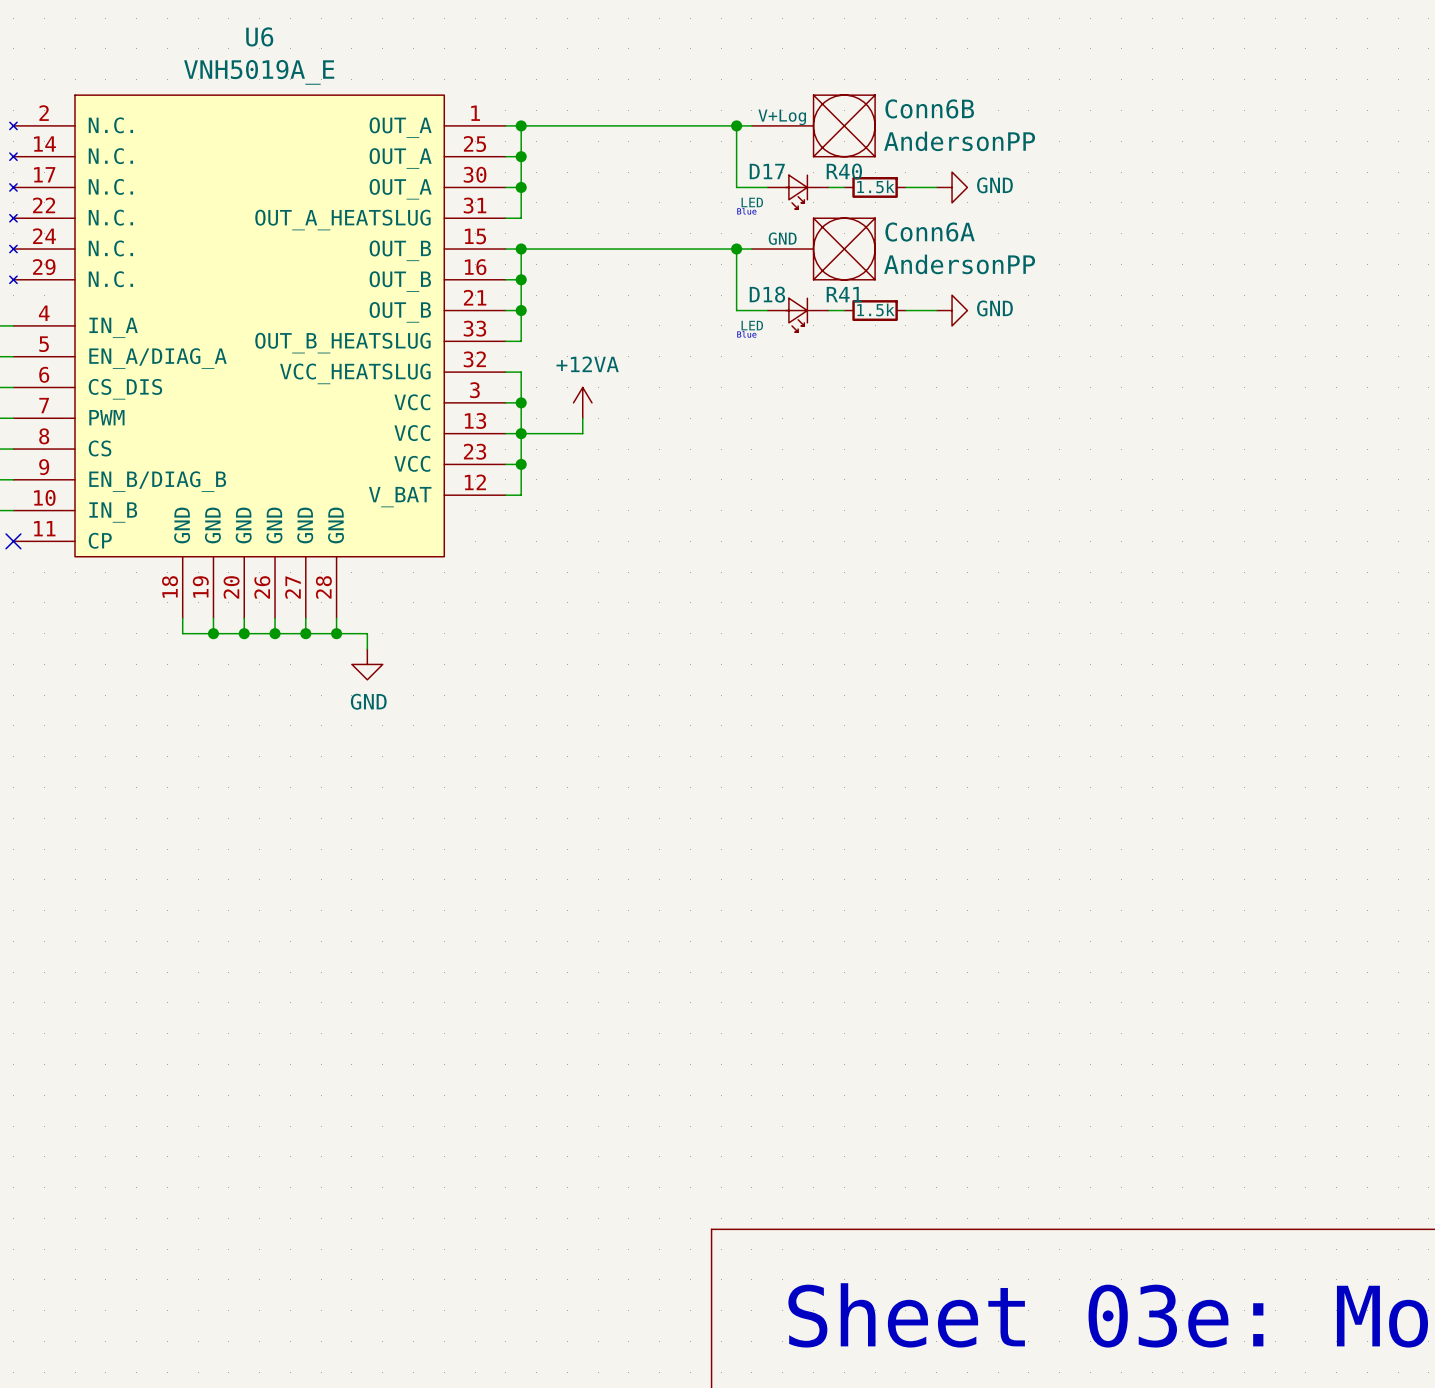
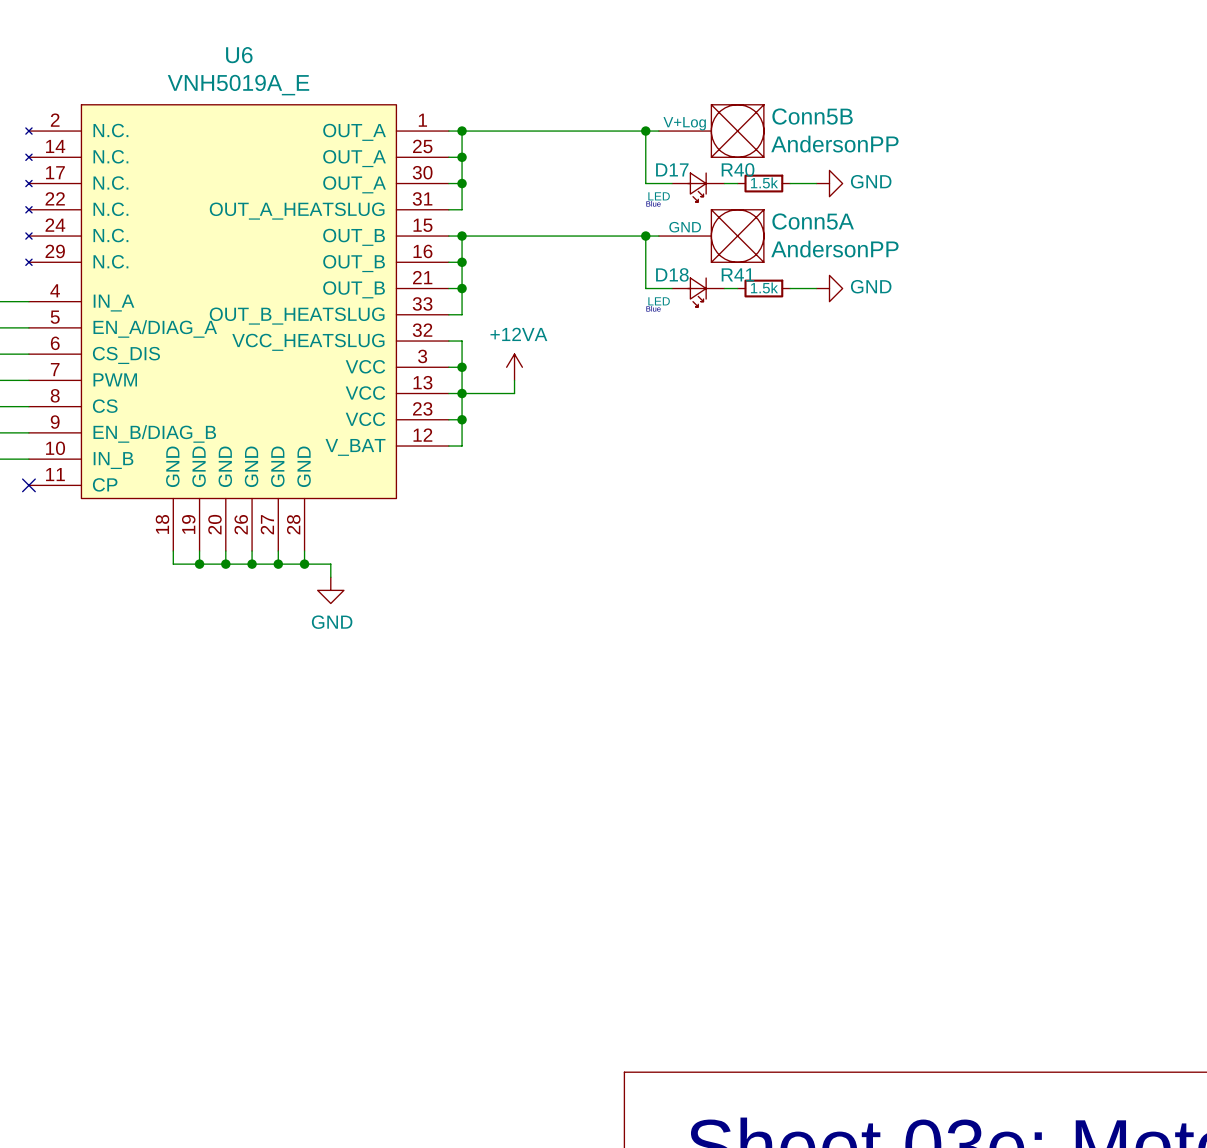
Conn6B name: Conn6B (929, 108) -> Conn5B (812, 116)
Conn6A name: Conn6A (930, 232) -> Conn5A (813, 221)

